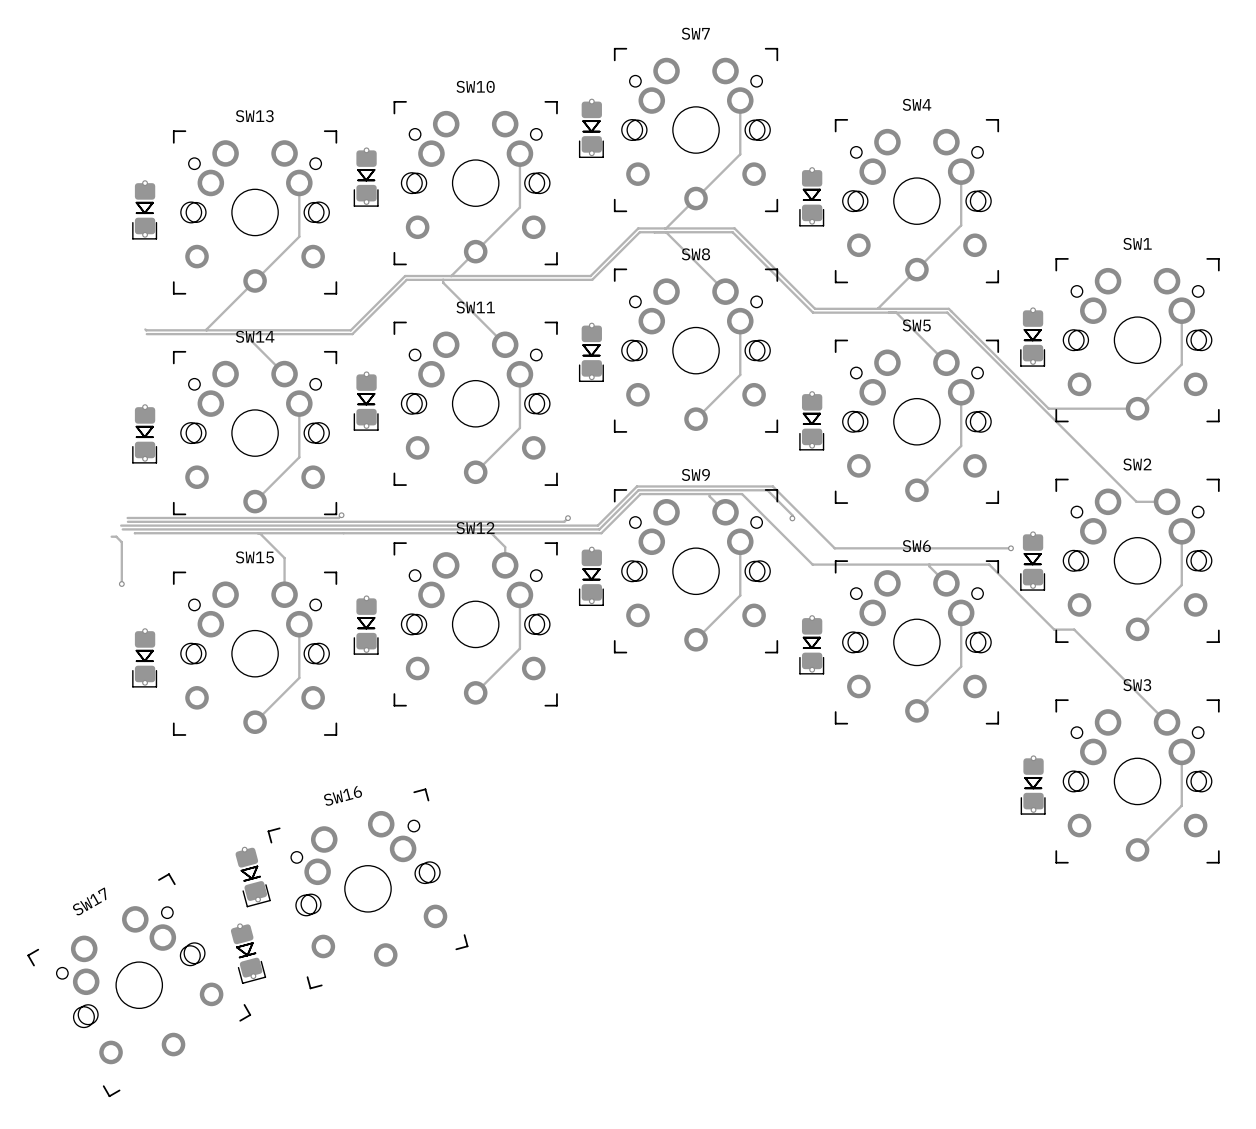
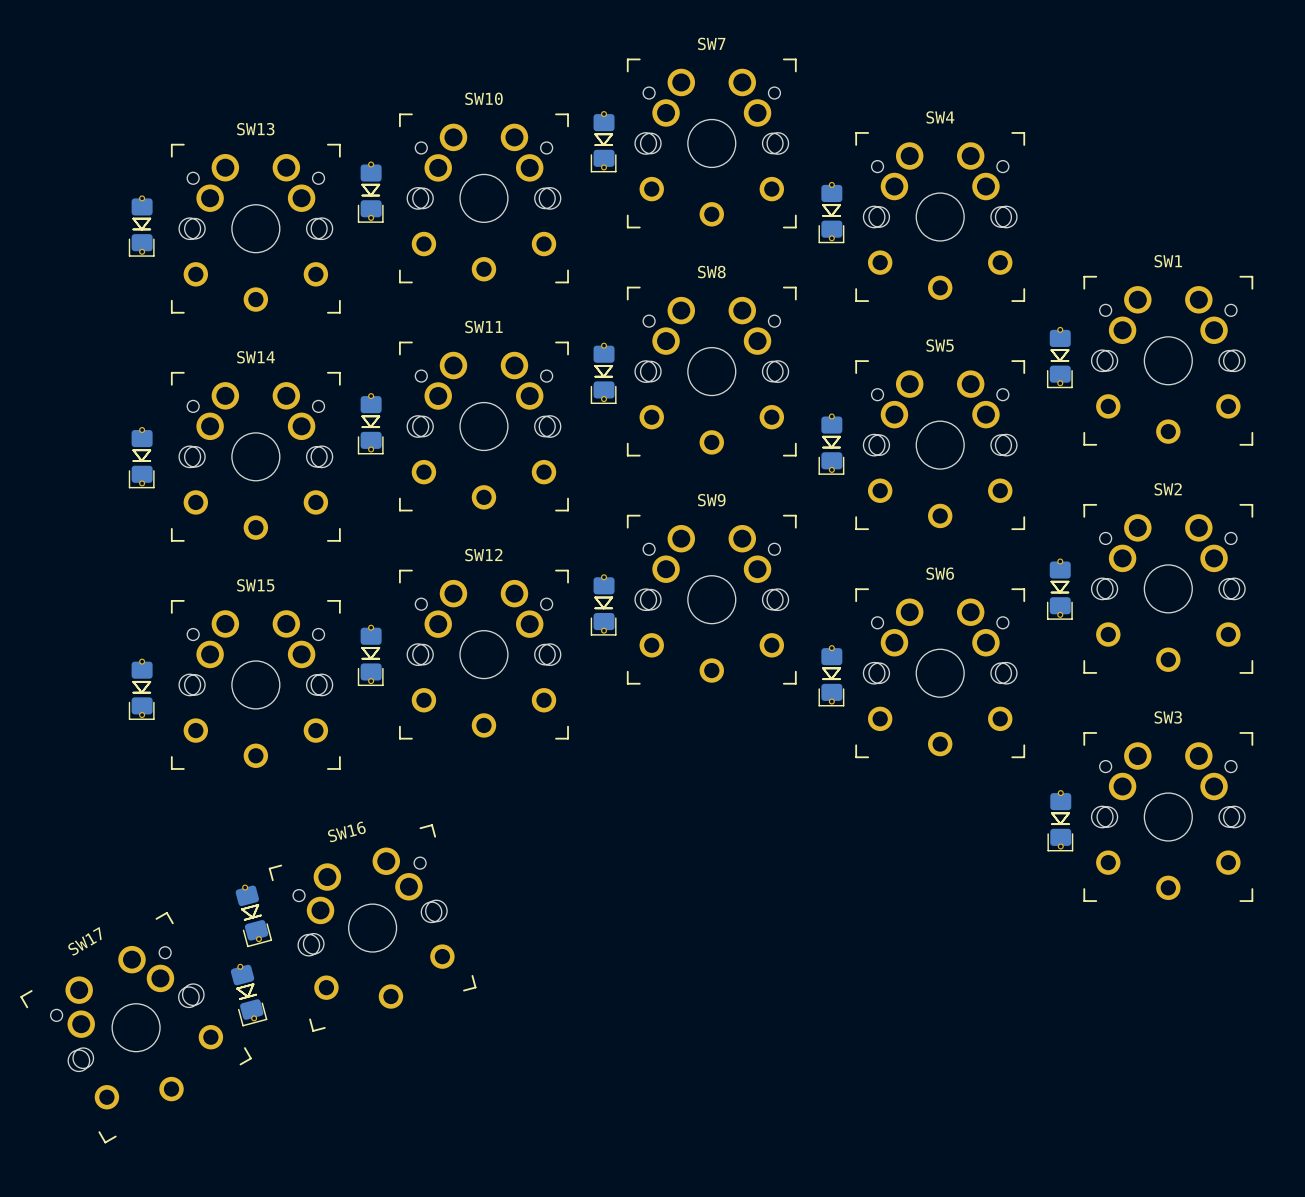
track: (740, 100) (740, 154) (666, 228) -> none
track: (519, 153) (519, 207) (451, 276) -> none
track: (961, 171) (961, 225) (878, 308) -> none
track: (299, 182) (299, 236) (206, 330) -> none
track: (666, 232) (725, 291) -> none
track: (443, 279) (443, 282) (505, 344) -> none
track: (1181, 310) (1181, 364) (1137, 408) (1048, 408) (948, 308) (815, 308) (734, 228) (638, 228) (590, 276) (405, 276) (350, 330) (145, 329) -> none
track: (896, 312) (946, 362) -> none
track: (740, 321) (740, 374) (696, 419) -> none
track: (146, 334) (352, 334) (406, 279) (592, 279) (639, 232) (732, 232) (813, 312) (947, 312) (1136, 501) (1167, 501) -> none
track: (247, 334) (247, 336) (284, 374) -> none
track: (519, 374) (519, 428) (475, 472) -> none
track: (961, 392) (961, 446) (916, 490) -> none
track: (299, 403) (299, 457) (255, 501) -> none
track: (709, 494) (709, 496) (725, 512) -> none
track: (341, 515) (338, 518) (127, 518) -> none
via: (341, 515) -> none
track: (568, 518) (564, 521) (127, 521) -> none
via: (568, 518) -> none
track: (792, 518) (792, 515) (767, 490) (638, 490) (599, 529) (122, 529) -> none
via: (792, 518) -> none
track: (121, 525) (597, 525) (636, 486) (772, 486) (834, 548) (1010, 548) -> none
track: (1181, 531) (1181, 585) (1137, 629) -> none
track: (134, 533) (601, 533) (640, 494) (742, 494) (812, 564) (989, 564) (1054, 629) (1074, 629) (1167, 722) -> none
track: (259, 533) (284, 558) (284, 594) -> none
track: (491, 533) (505, 547) (505, 565) -> none
track: (111, 536) (116, 536) (121, 542) (121, 584) -> none
track: (740, 541) (740, 595) (696, 639) -> none
via: (1010, 548) -> none
track: (929, 564) (946, 583) -> none
via: (121, 584) -> none
track: (519, 594) (519, 648) (475, 692) -> none
track: (961, 612) (961, 666) (916, 710) -> none
track: (299, 624) (299, 677) (255, 722) -> none
track: (1181, 751) (1181, 805) (1137, 849) -> none

